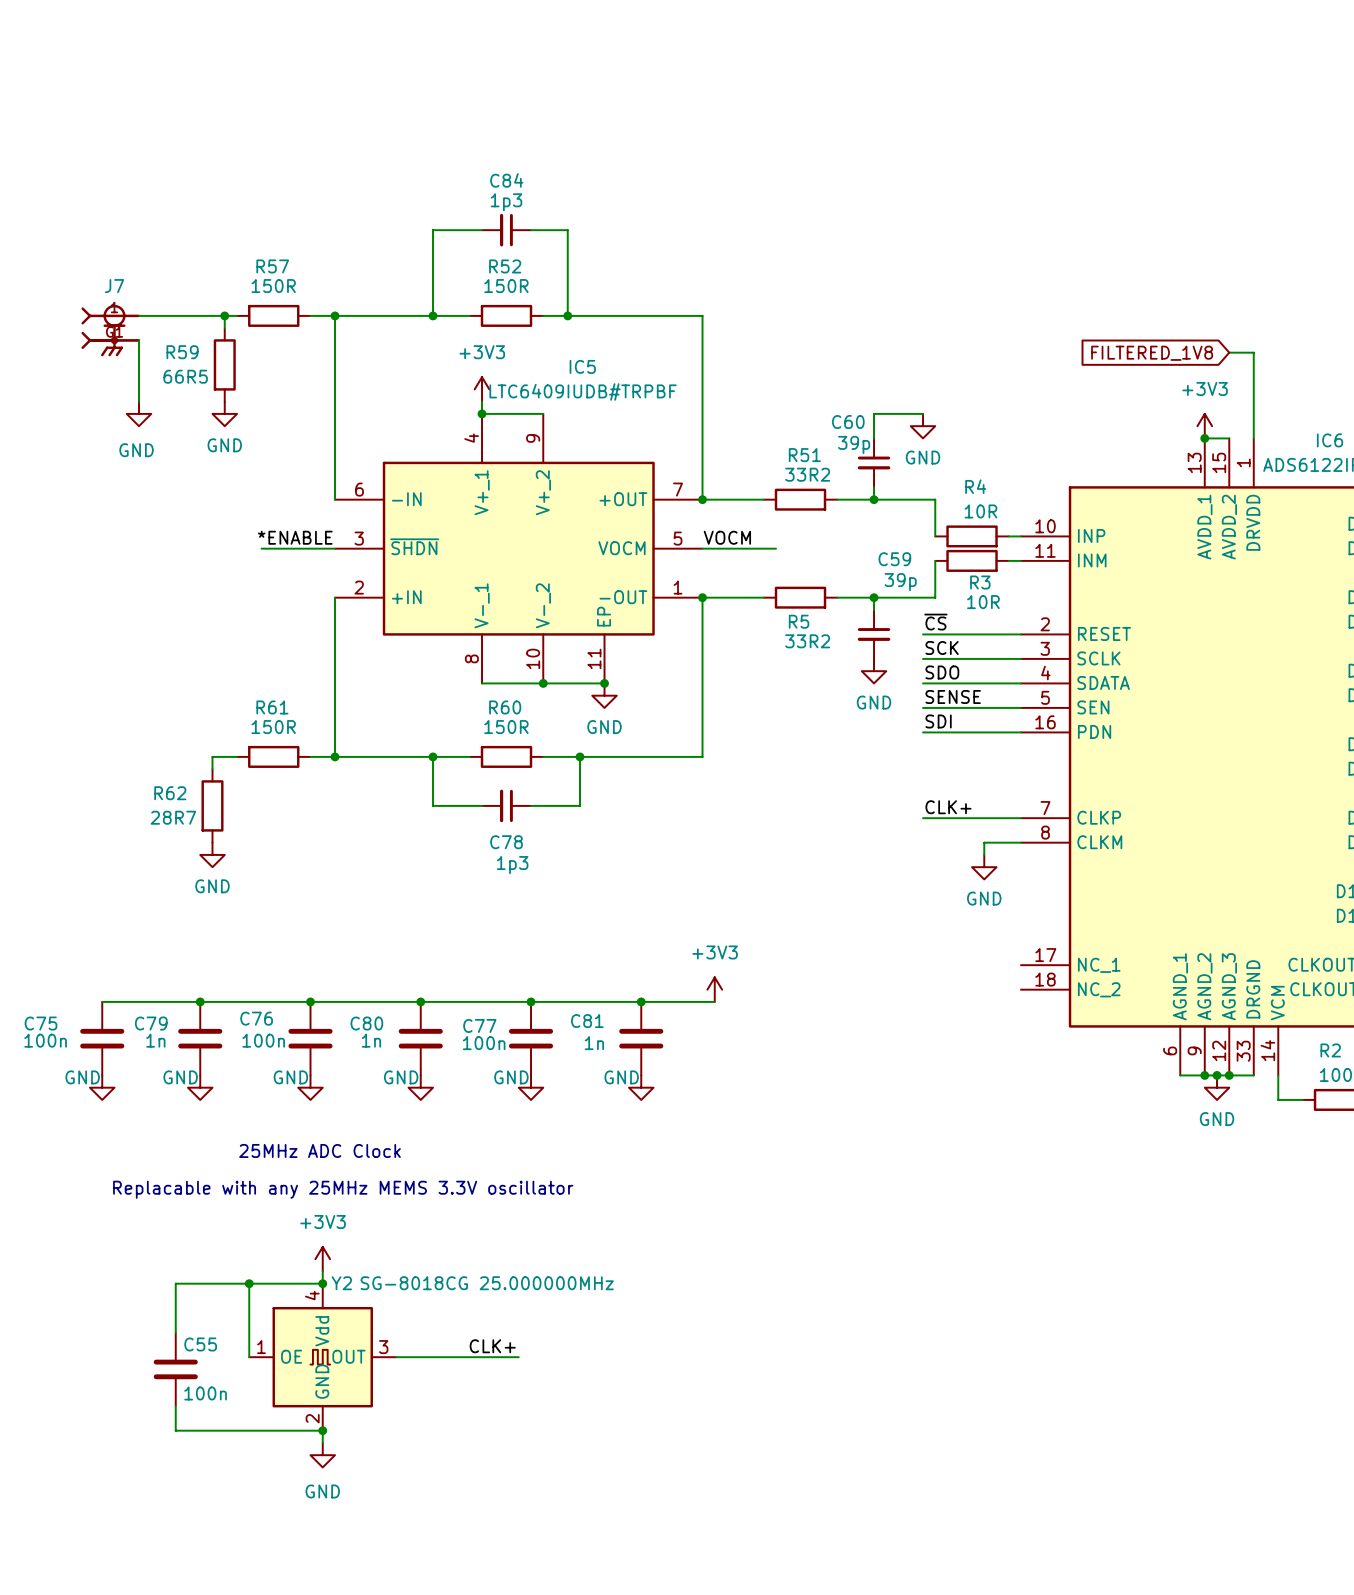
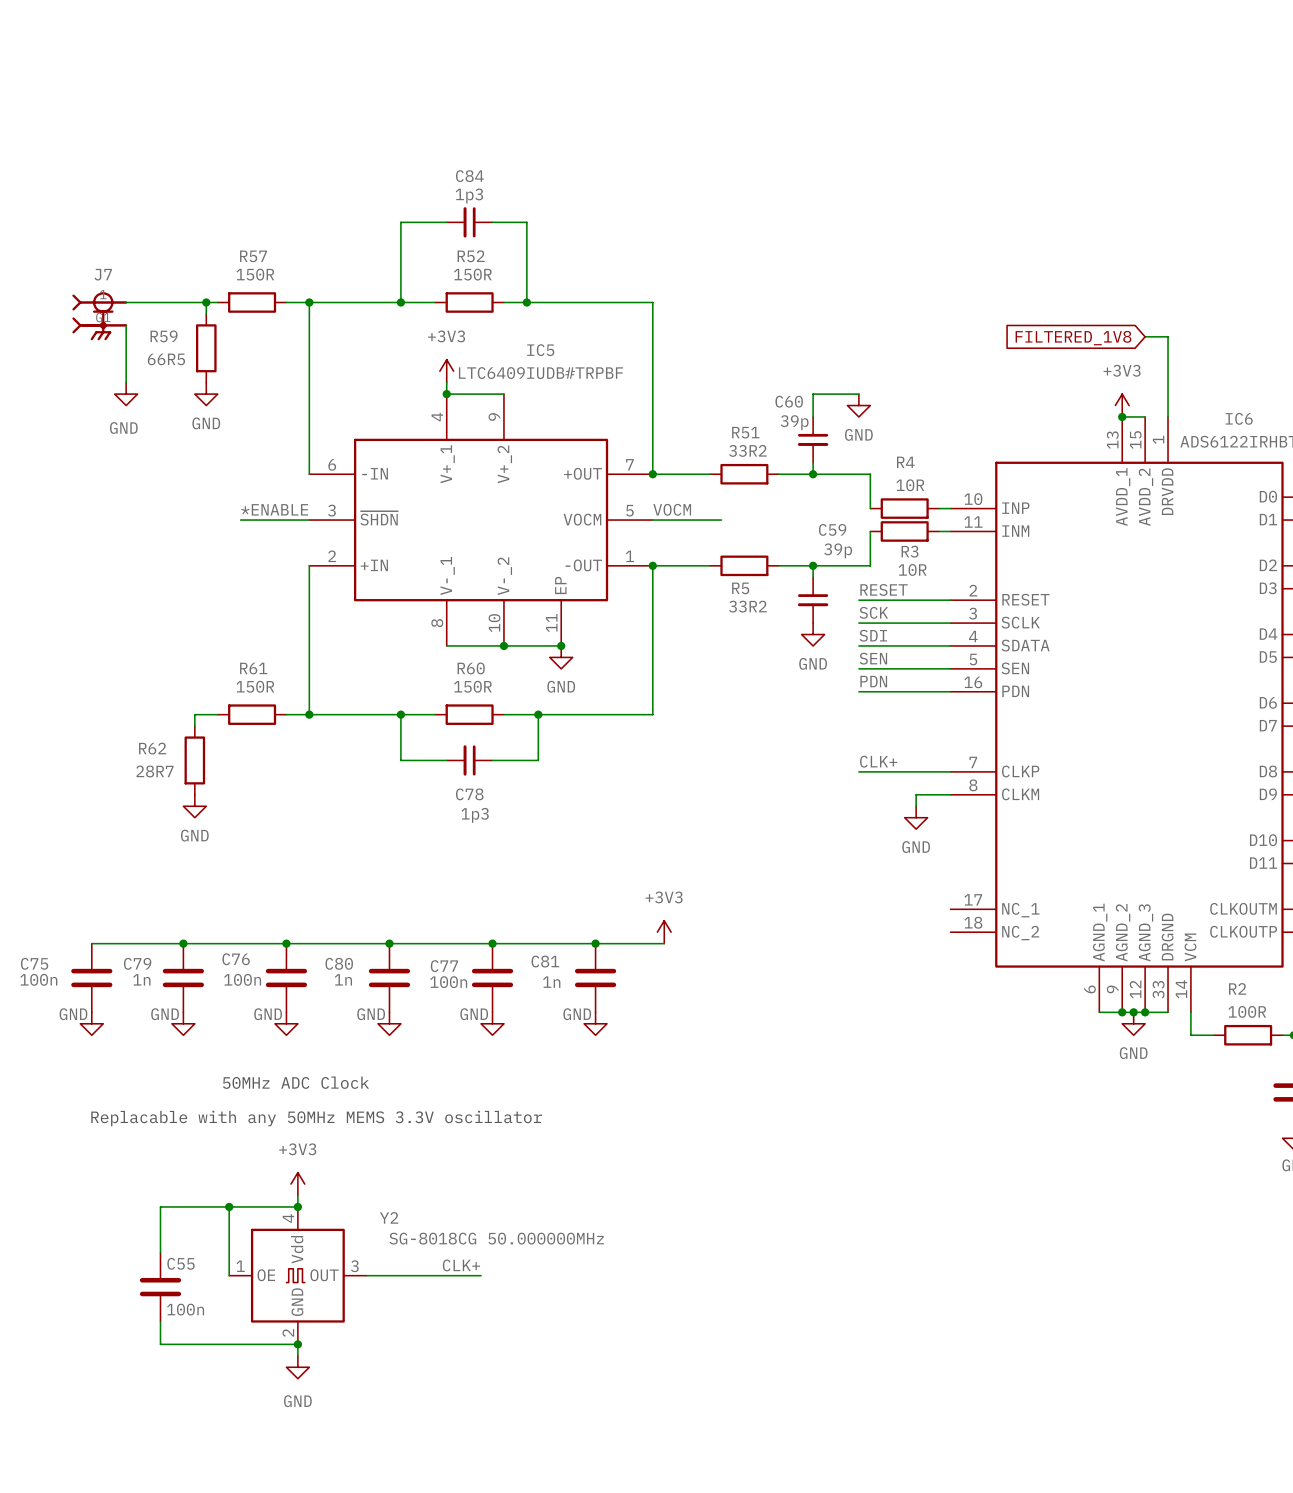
label: ~{CS} (935, 622) -> RESET (884, 589)
label: SDO (942, 672) -> SDI (873, 635)
label: SENSE (953, 696) -> SEN (873, 658)
label: SDI (938, 721) -> PDN (873, 681)
text: 25MHz ADC Clock (320, 1150) -> 50MHz ADC Clock (295, 1082)
text: Replacable with any 25MHz MEMS 3.3V oscillator (343, 1189) -> Replacable with any 50MHz MEMS 3.3V oscillator (316, 1118)
Y2 name position: Y2 (341, 1283) -> Y2 (389, 1217)
Y2 value: SG-8018CG 25.000000MHz (487, 1283) -> SG-8018CG 50.000000MHz (496, 1238)

